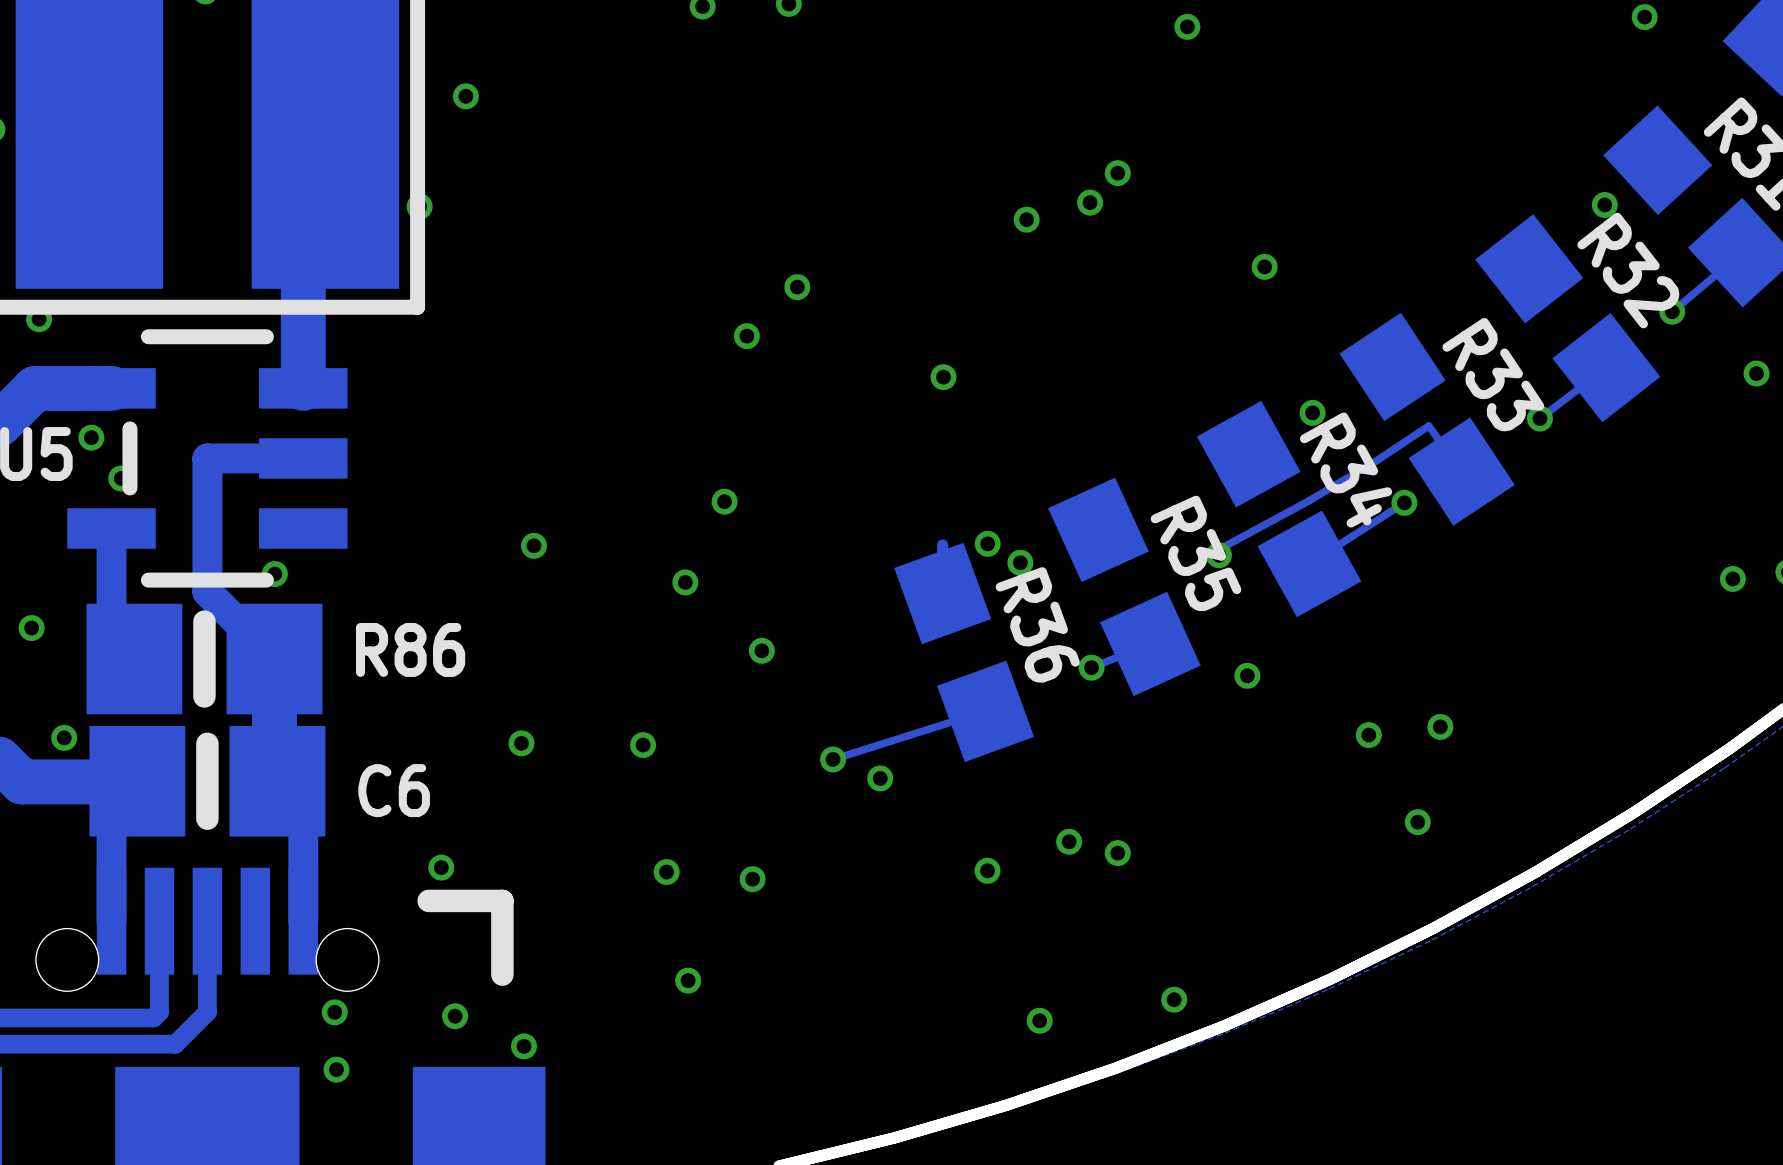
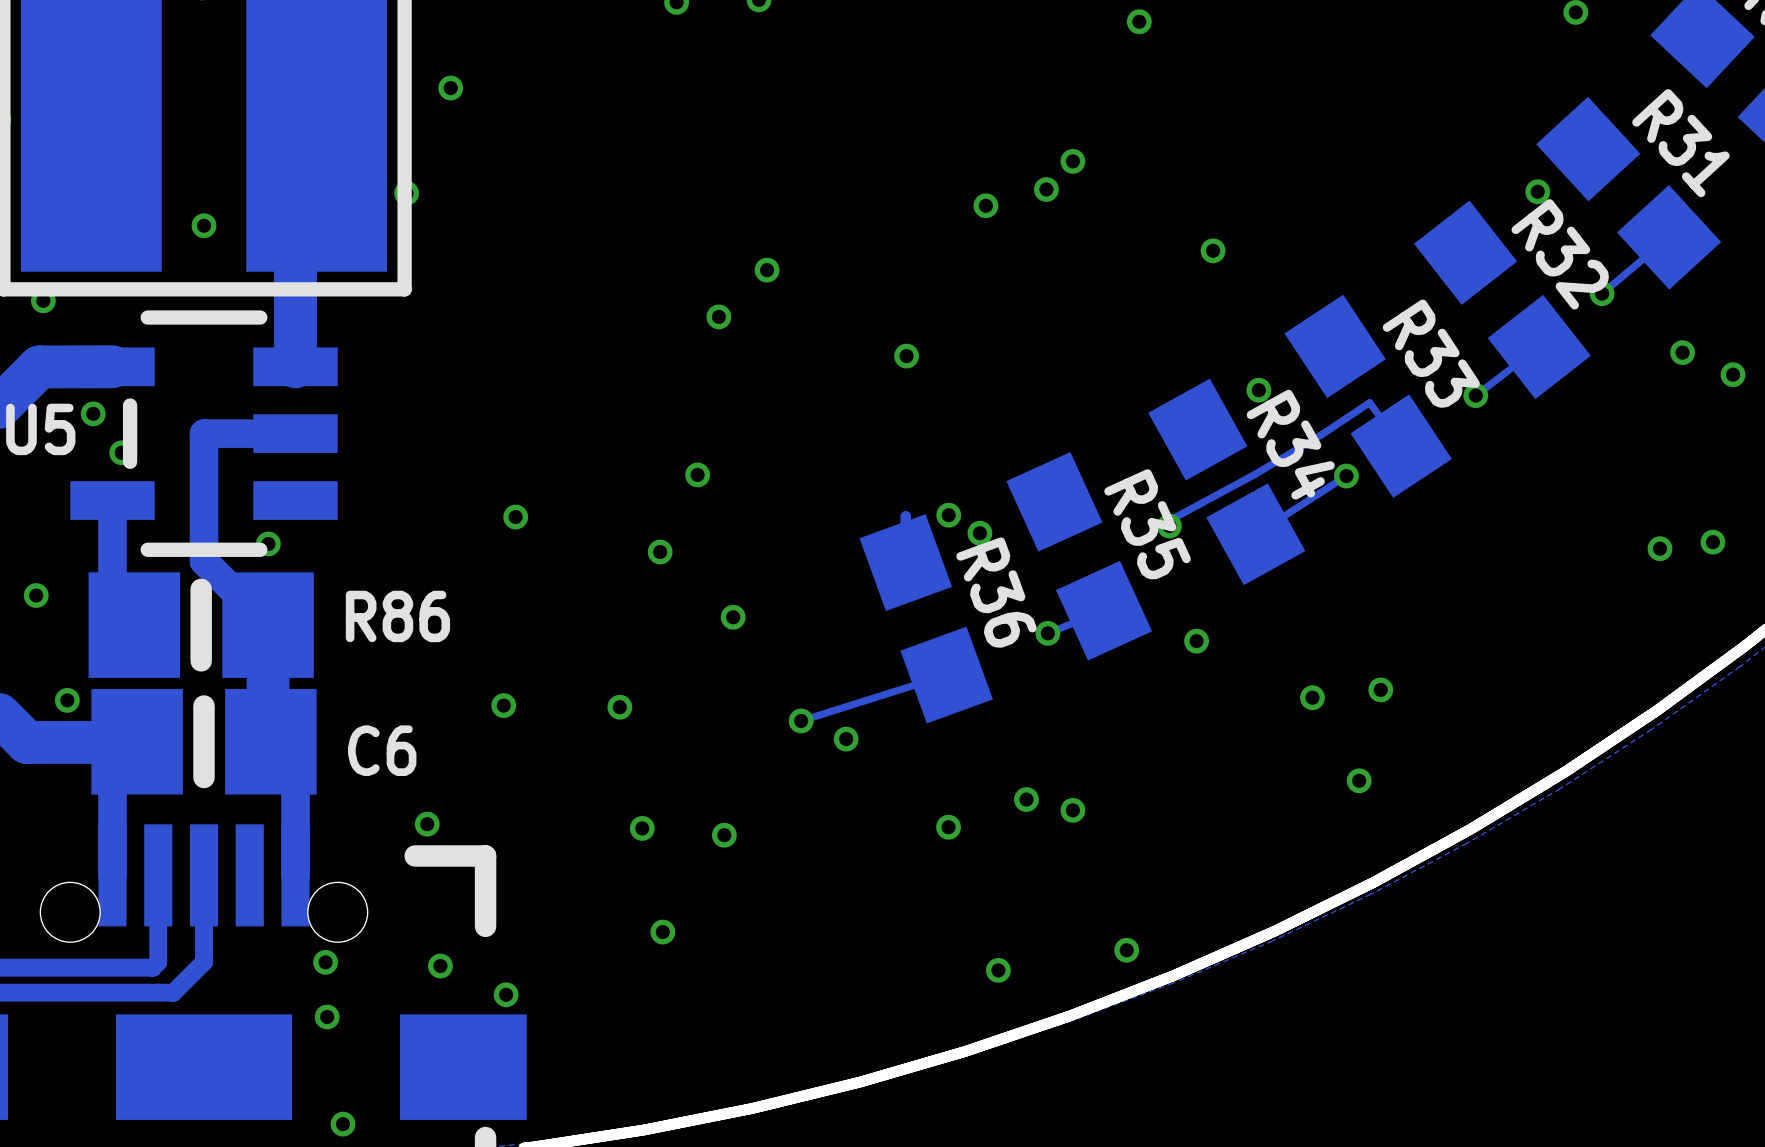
via: none -> (204, 225)

